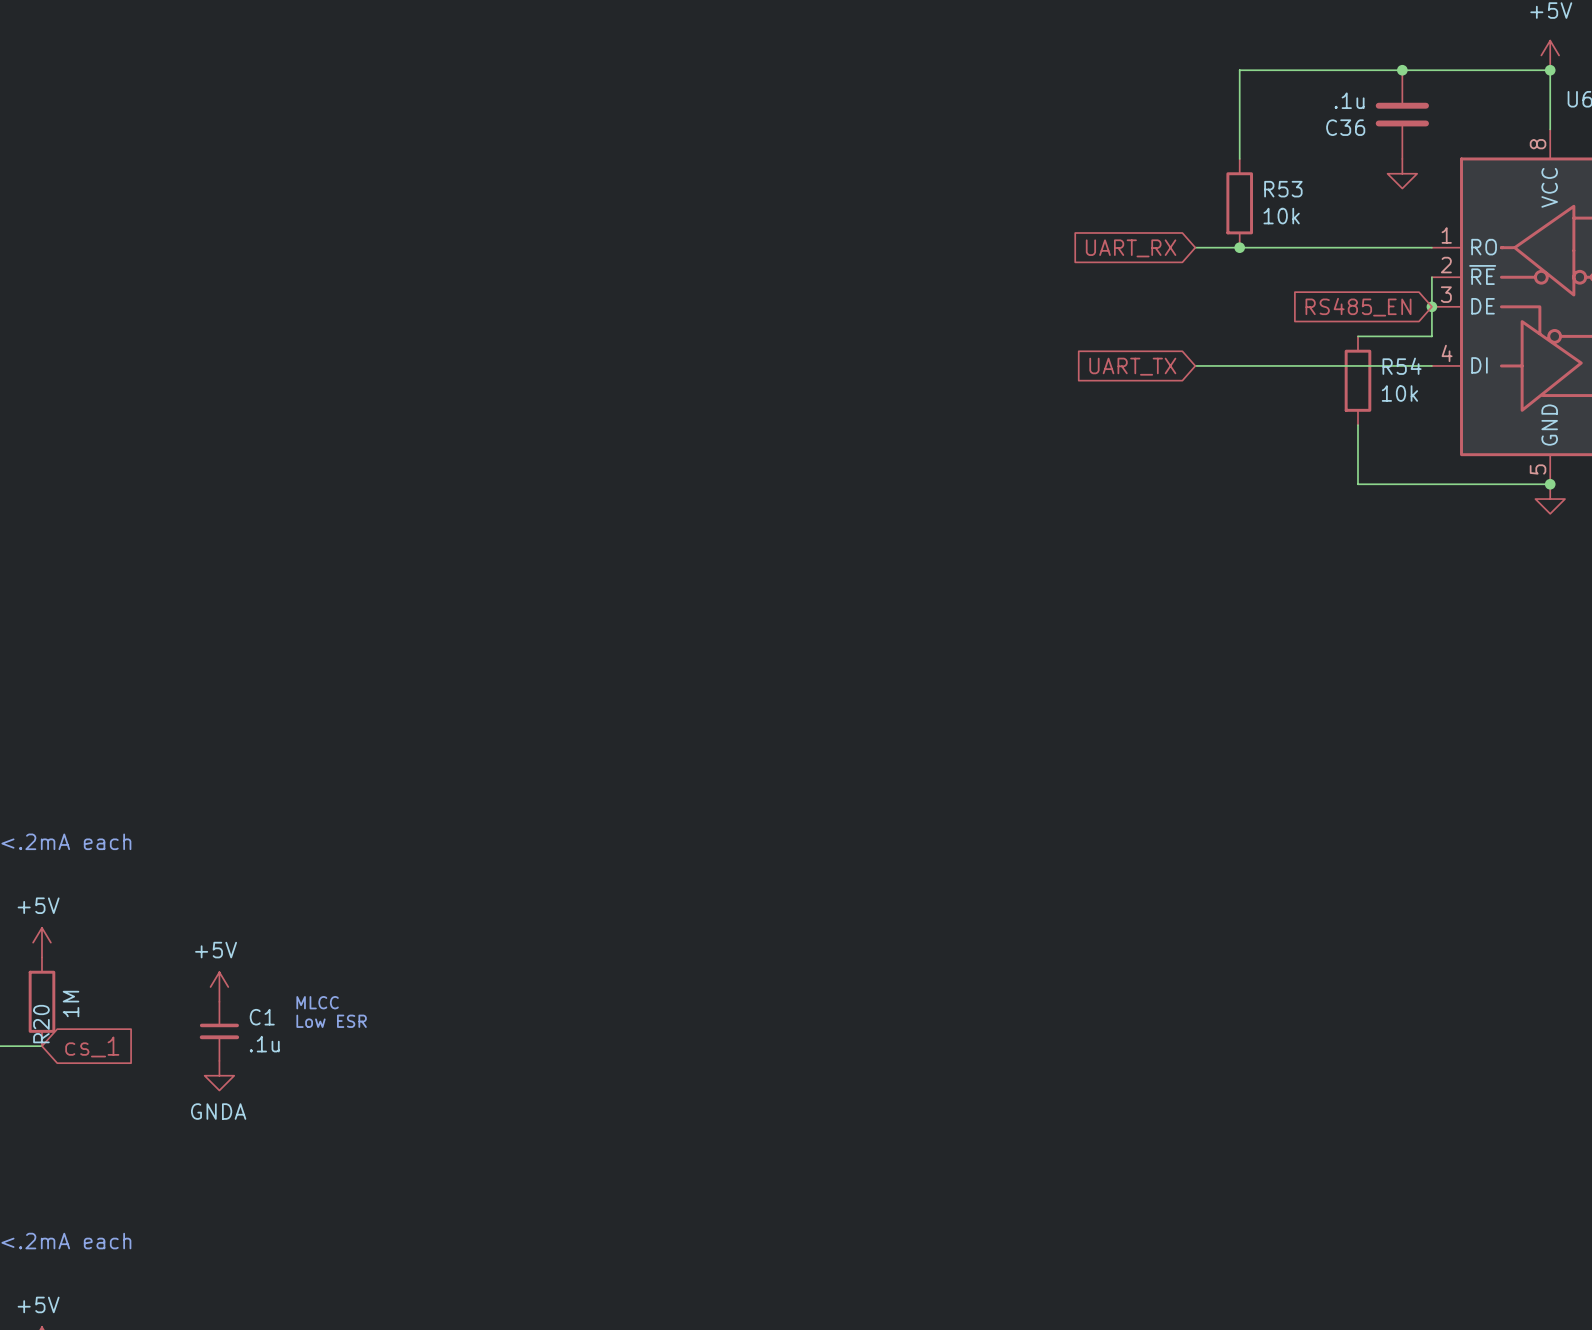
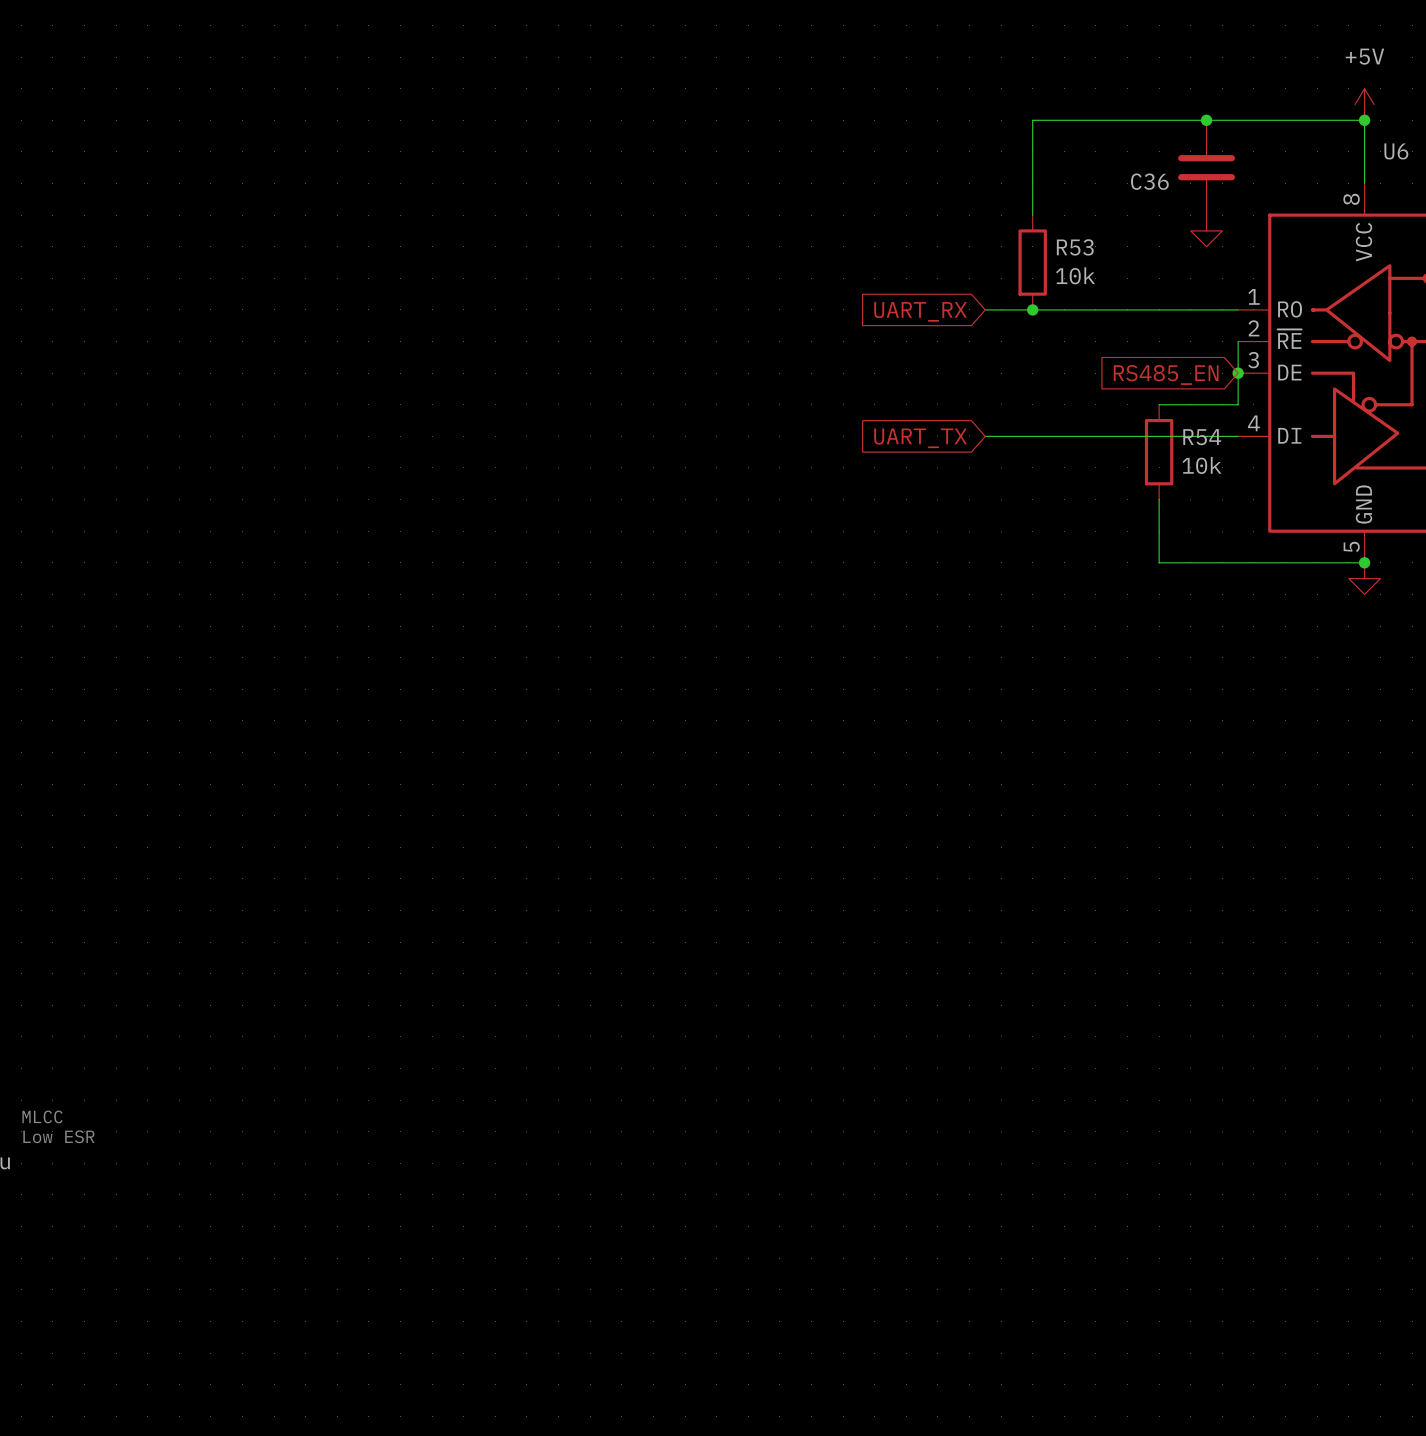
C36 value: .1u (1349, 100) -> none

